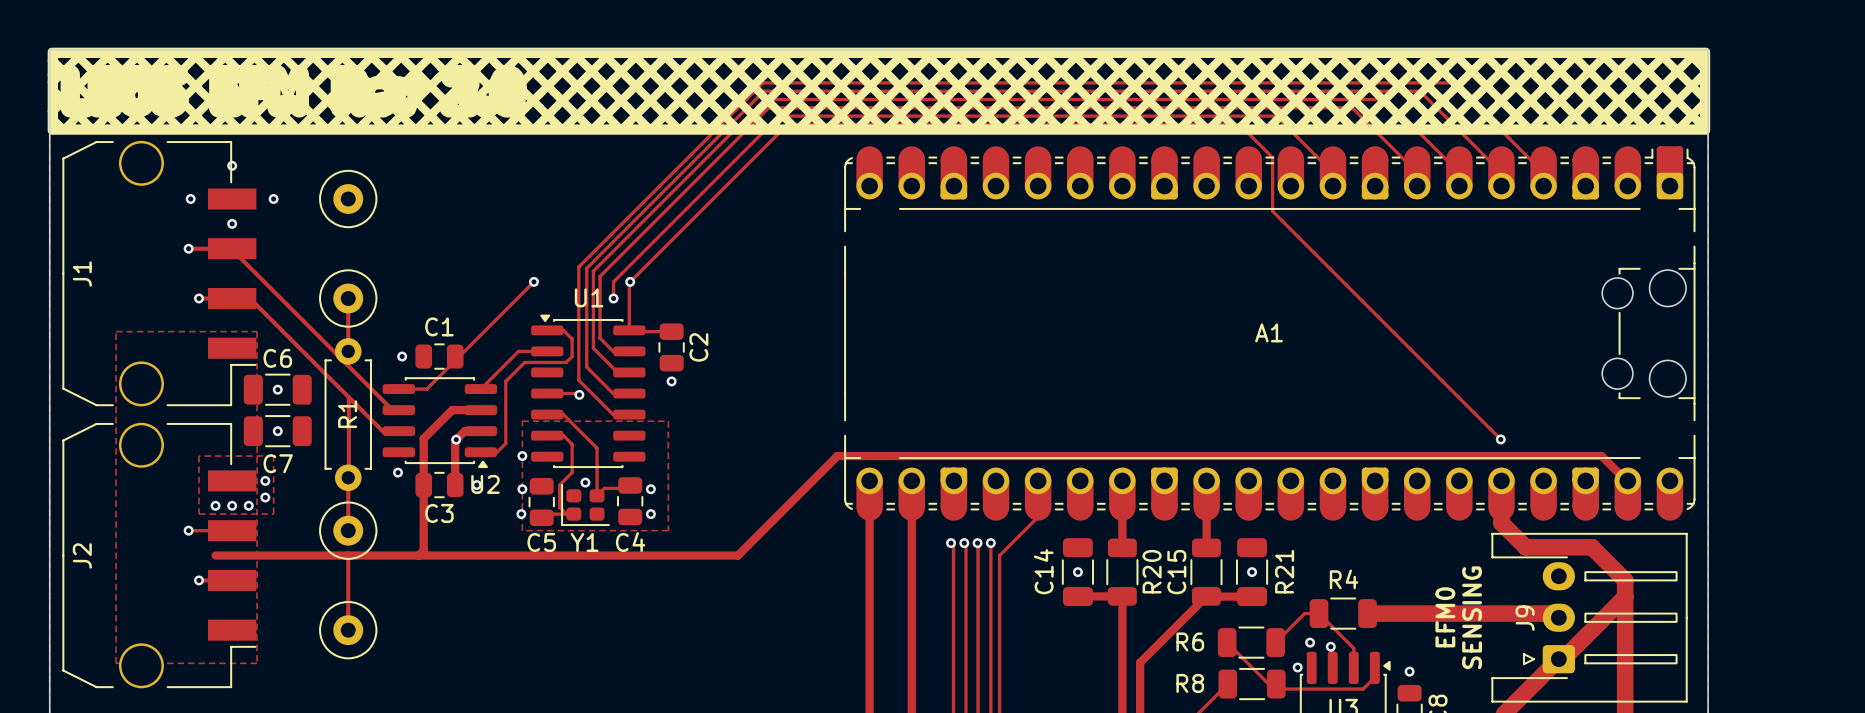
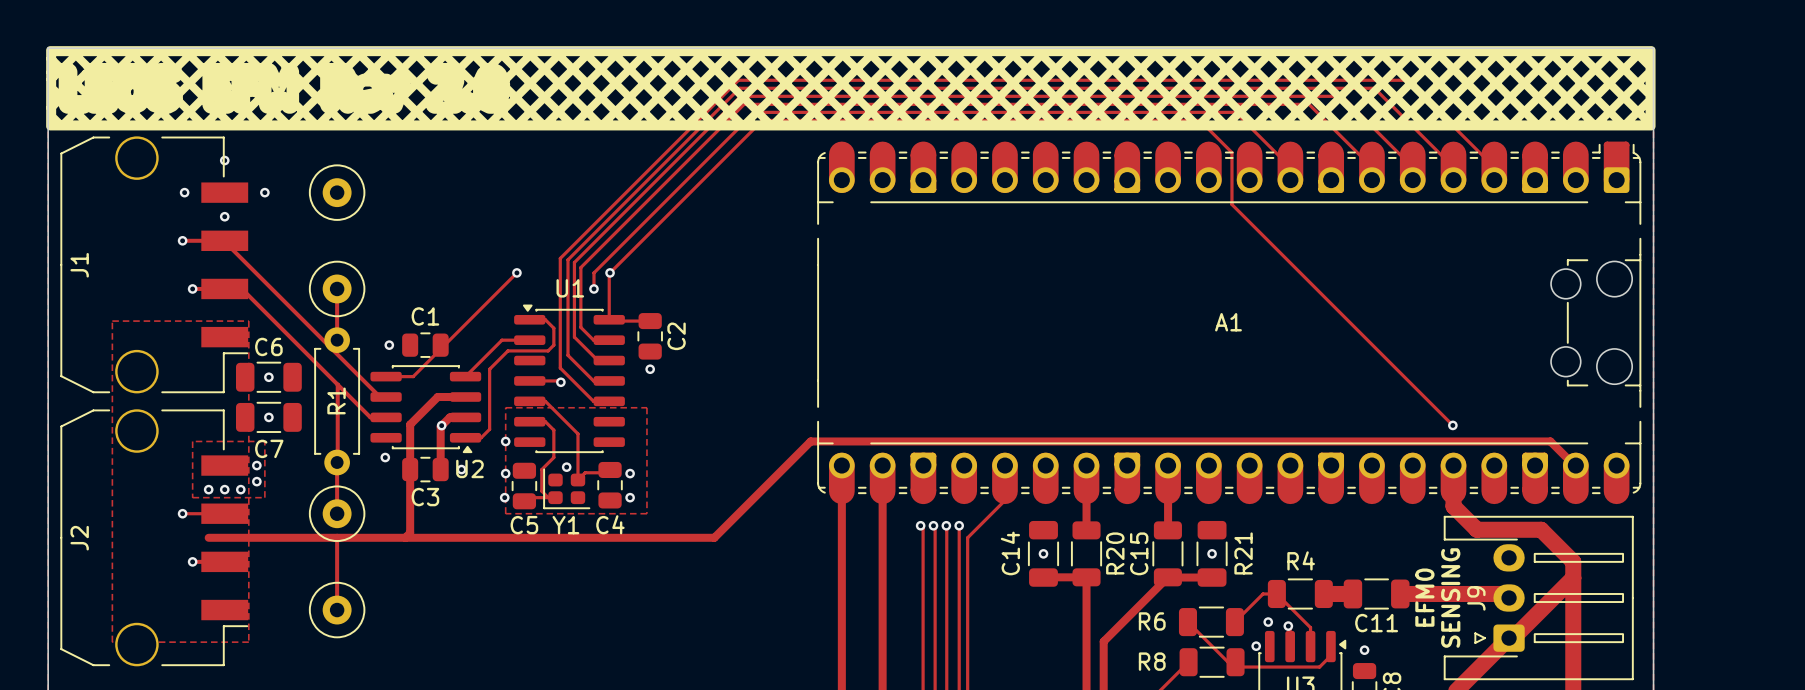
track: (1397, 613) (1454, 613) -> none
C11: none -> (1376, 593)
text: EFM0 (1445, 617) -> none
text: SENSING (1472, 617) -> EFM0 (1424, 597)
text: none -> SENSING (1450, 598)

